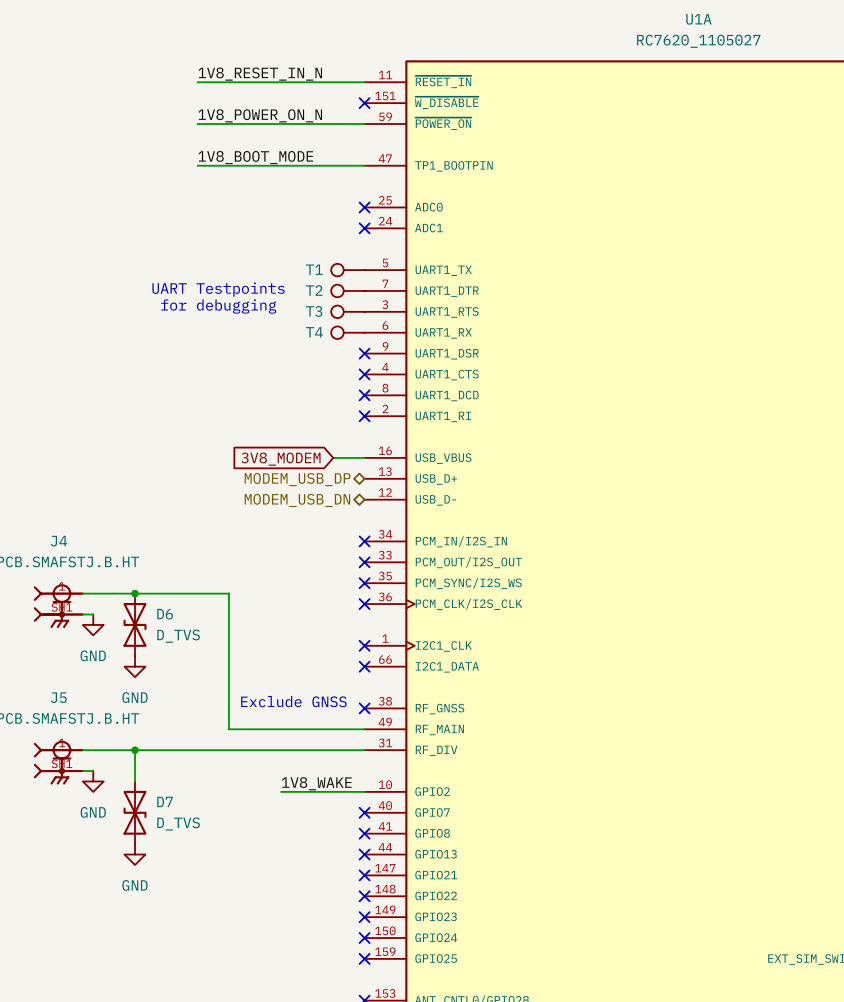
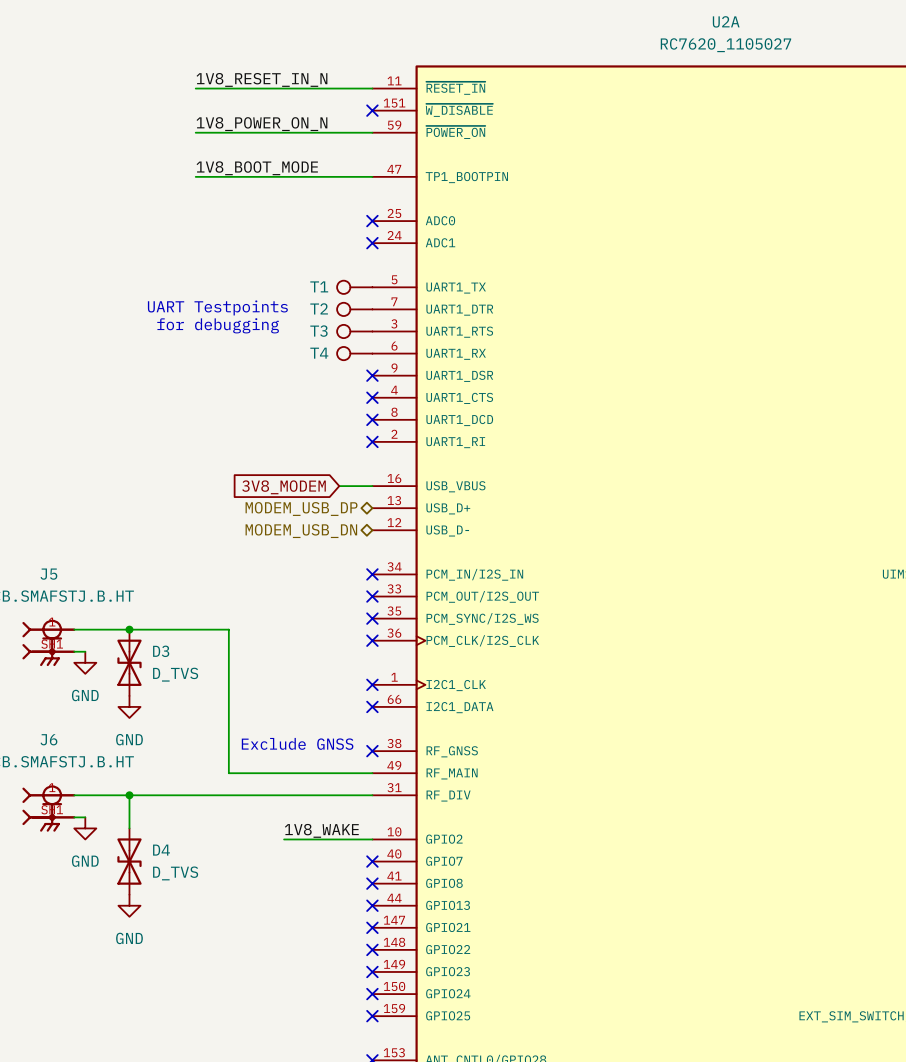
U1A name: U1A (698, 19) -> U2A (726, 21)
J4 name: J4 (59, 541) -> J5 (48, 574)
D6 name: D6 (165, 614) -> D3 (161, 651)
J5 name: J5 (58, 697) -> J6 (48, 739)
D7 name: D7 (165, 801) -> D4 (161, 850)

